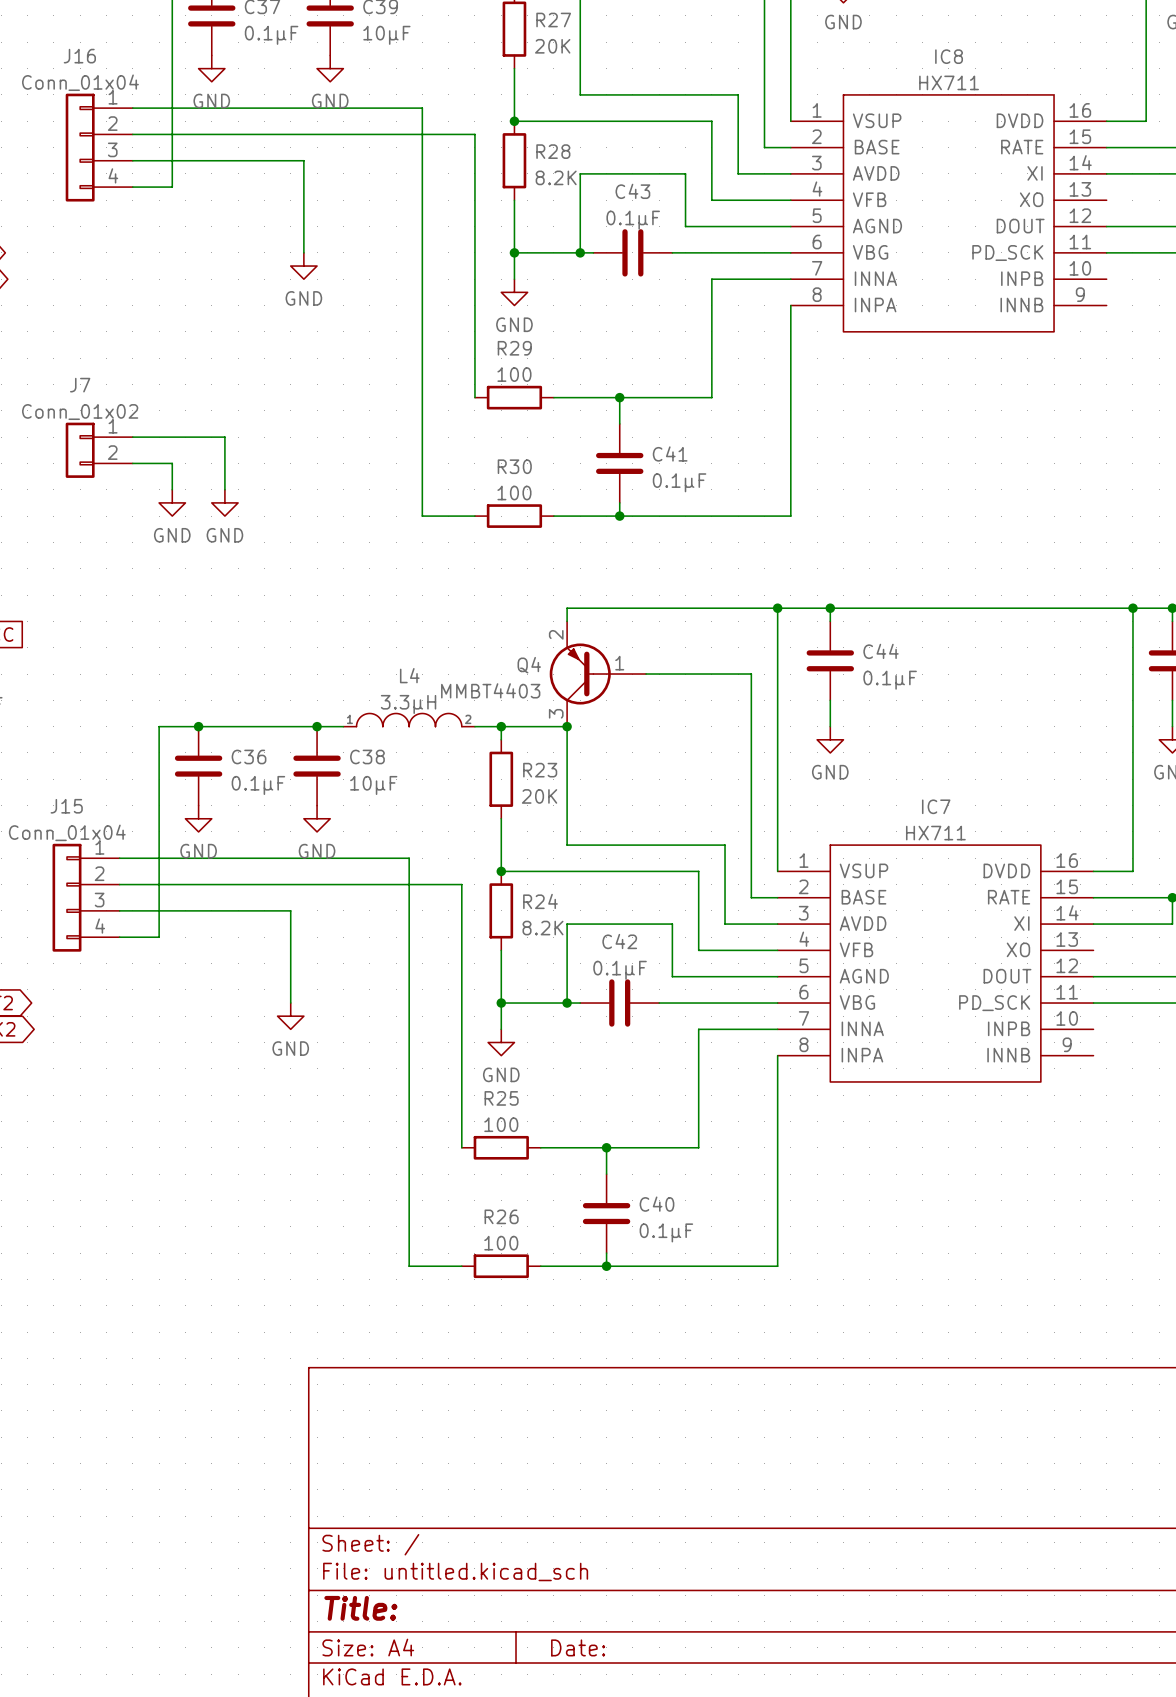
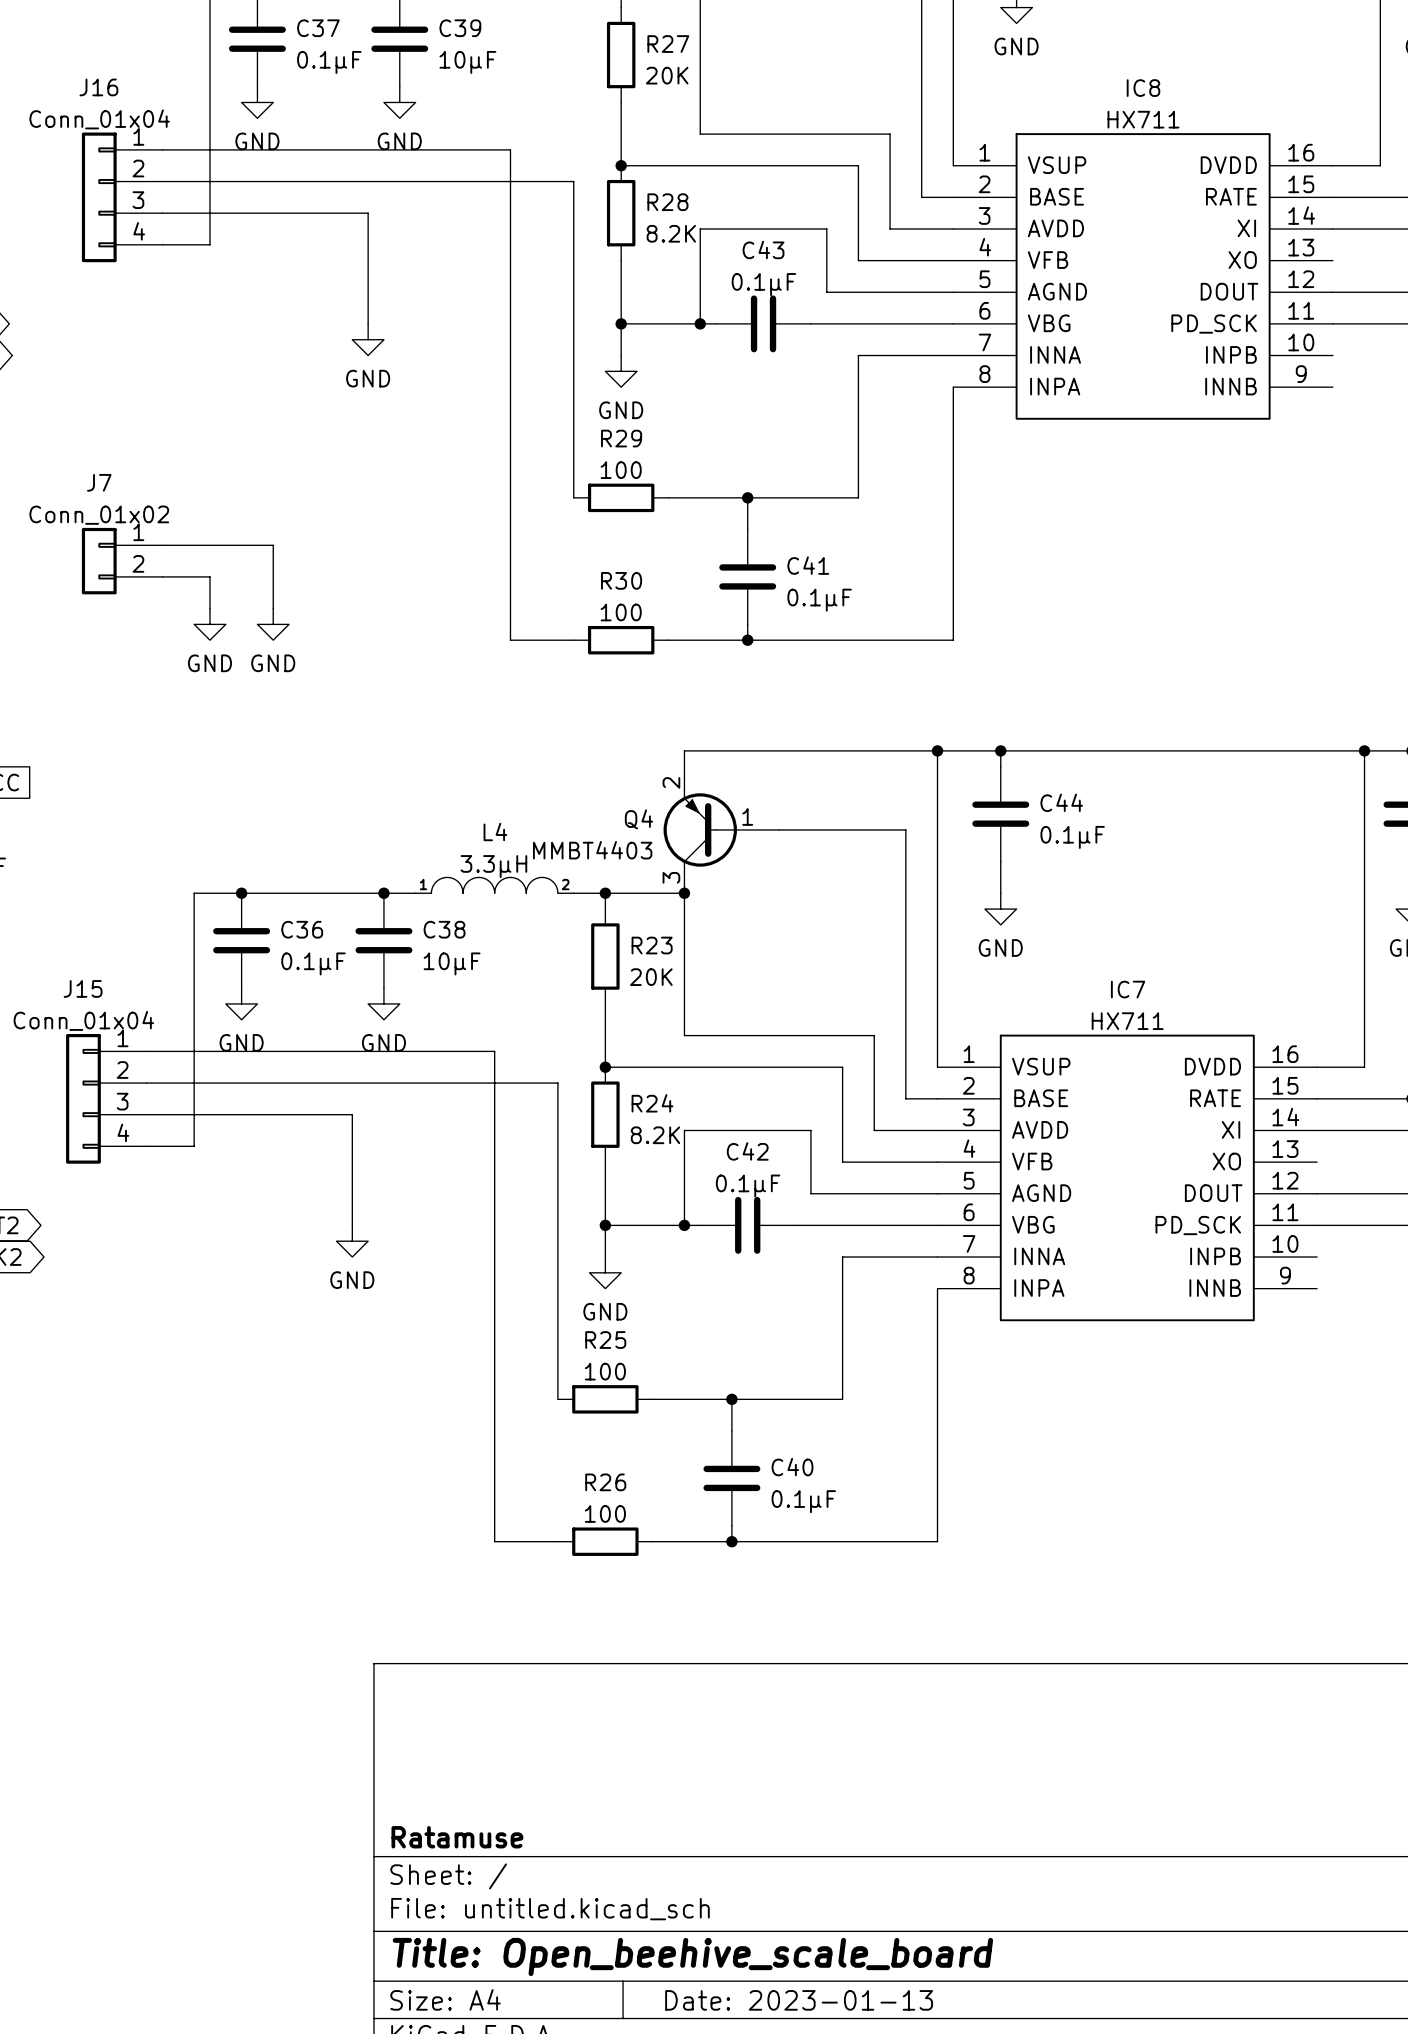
title block: none -> Ratamuse (457, 1837)
title block: Title: (360, 1608) -> Title: Open_beehive_scale_board (692, 1956)
title block: Date: (578, 1647) -> Date: 2023-01-13 (799, 2000)

